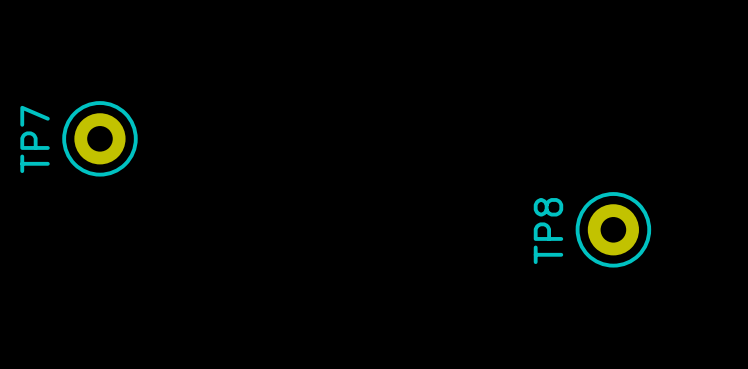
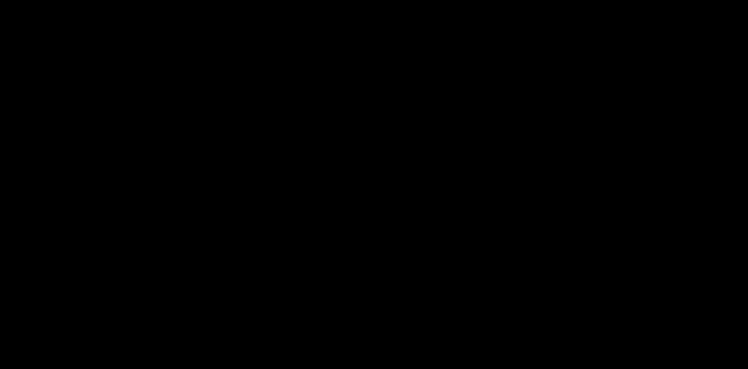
TP7: (99, 138) -> none
TP8: (613, 229) -> none

